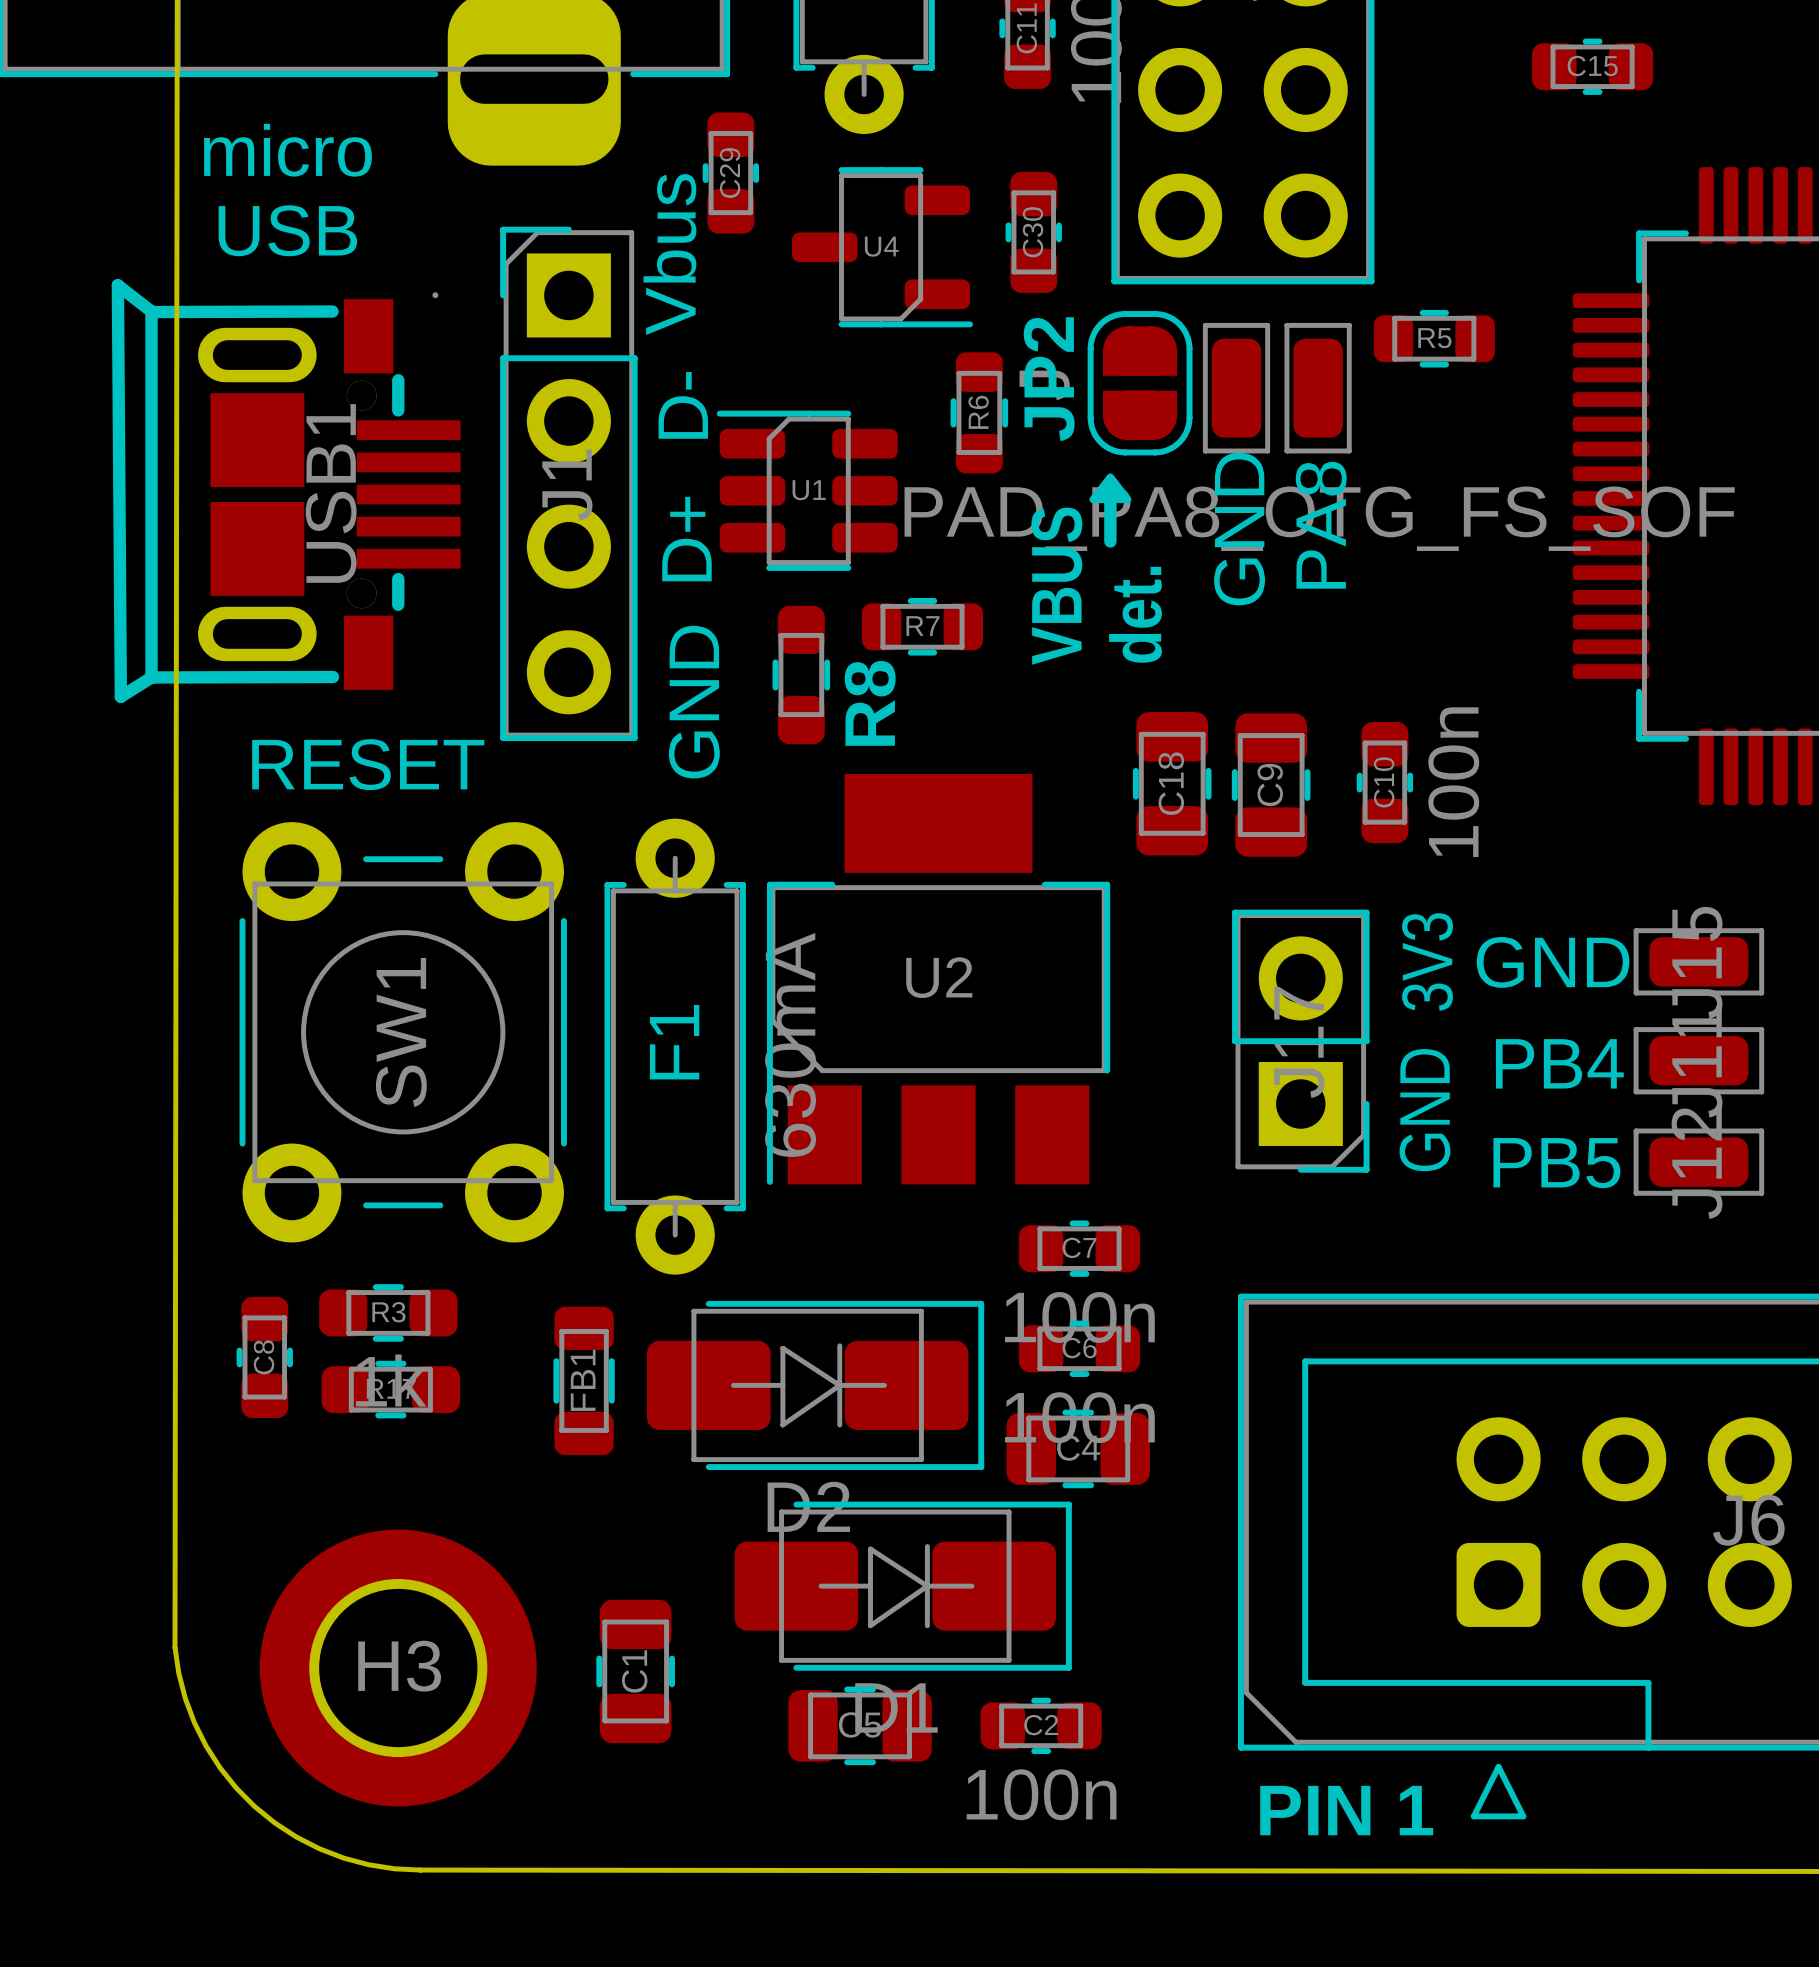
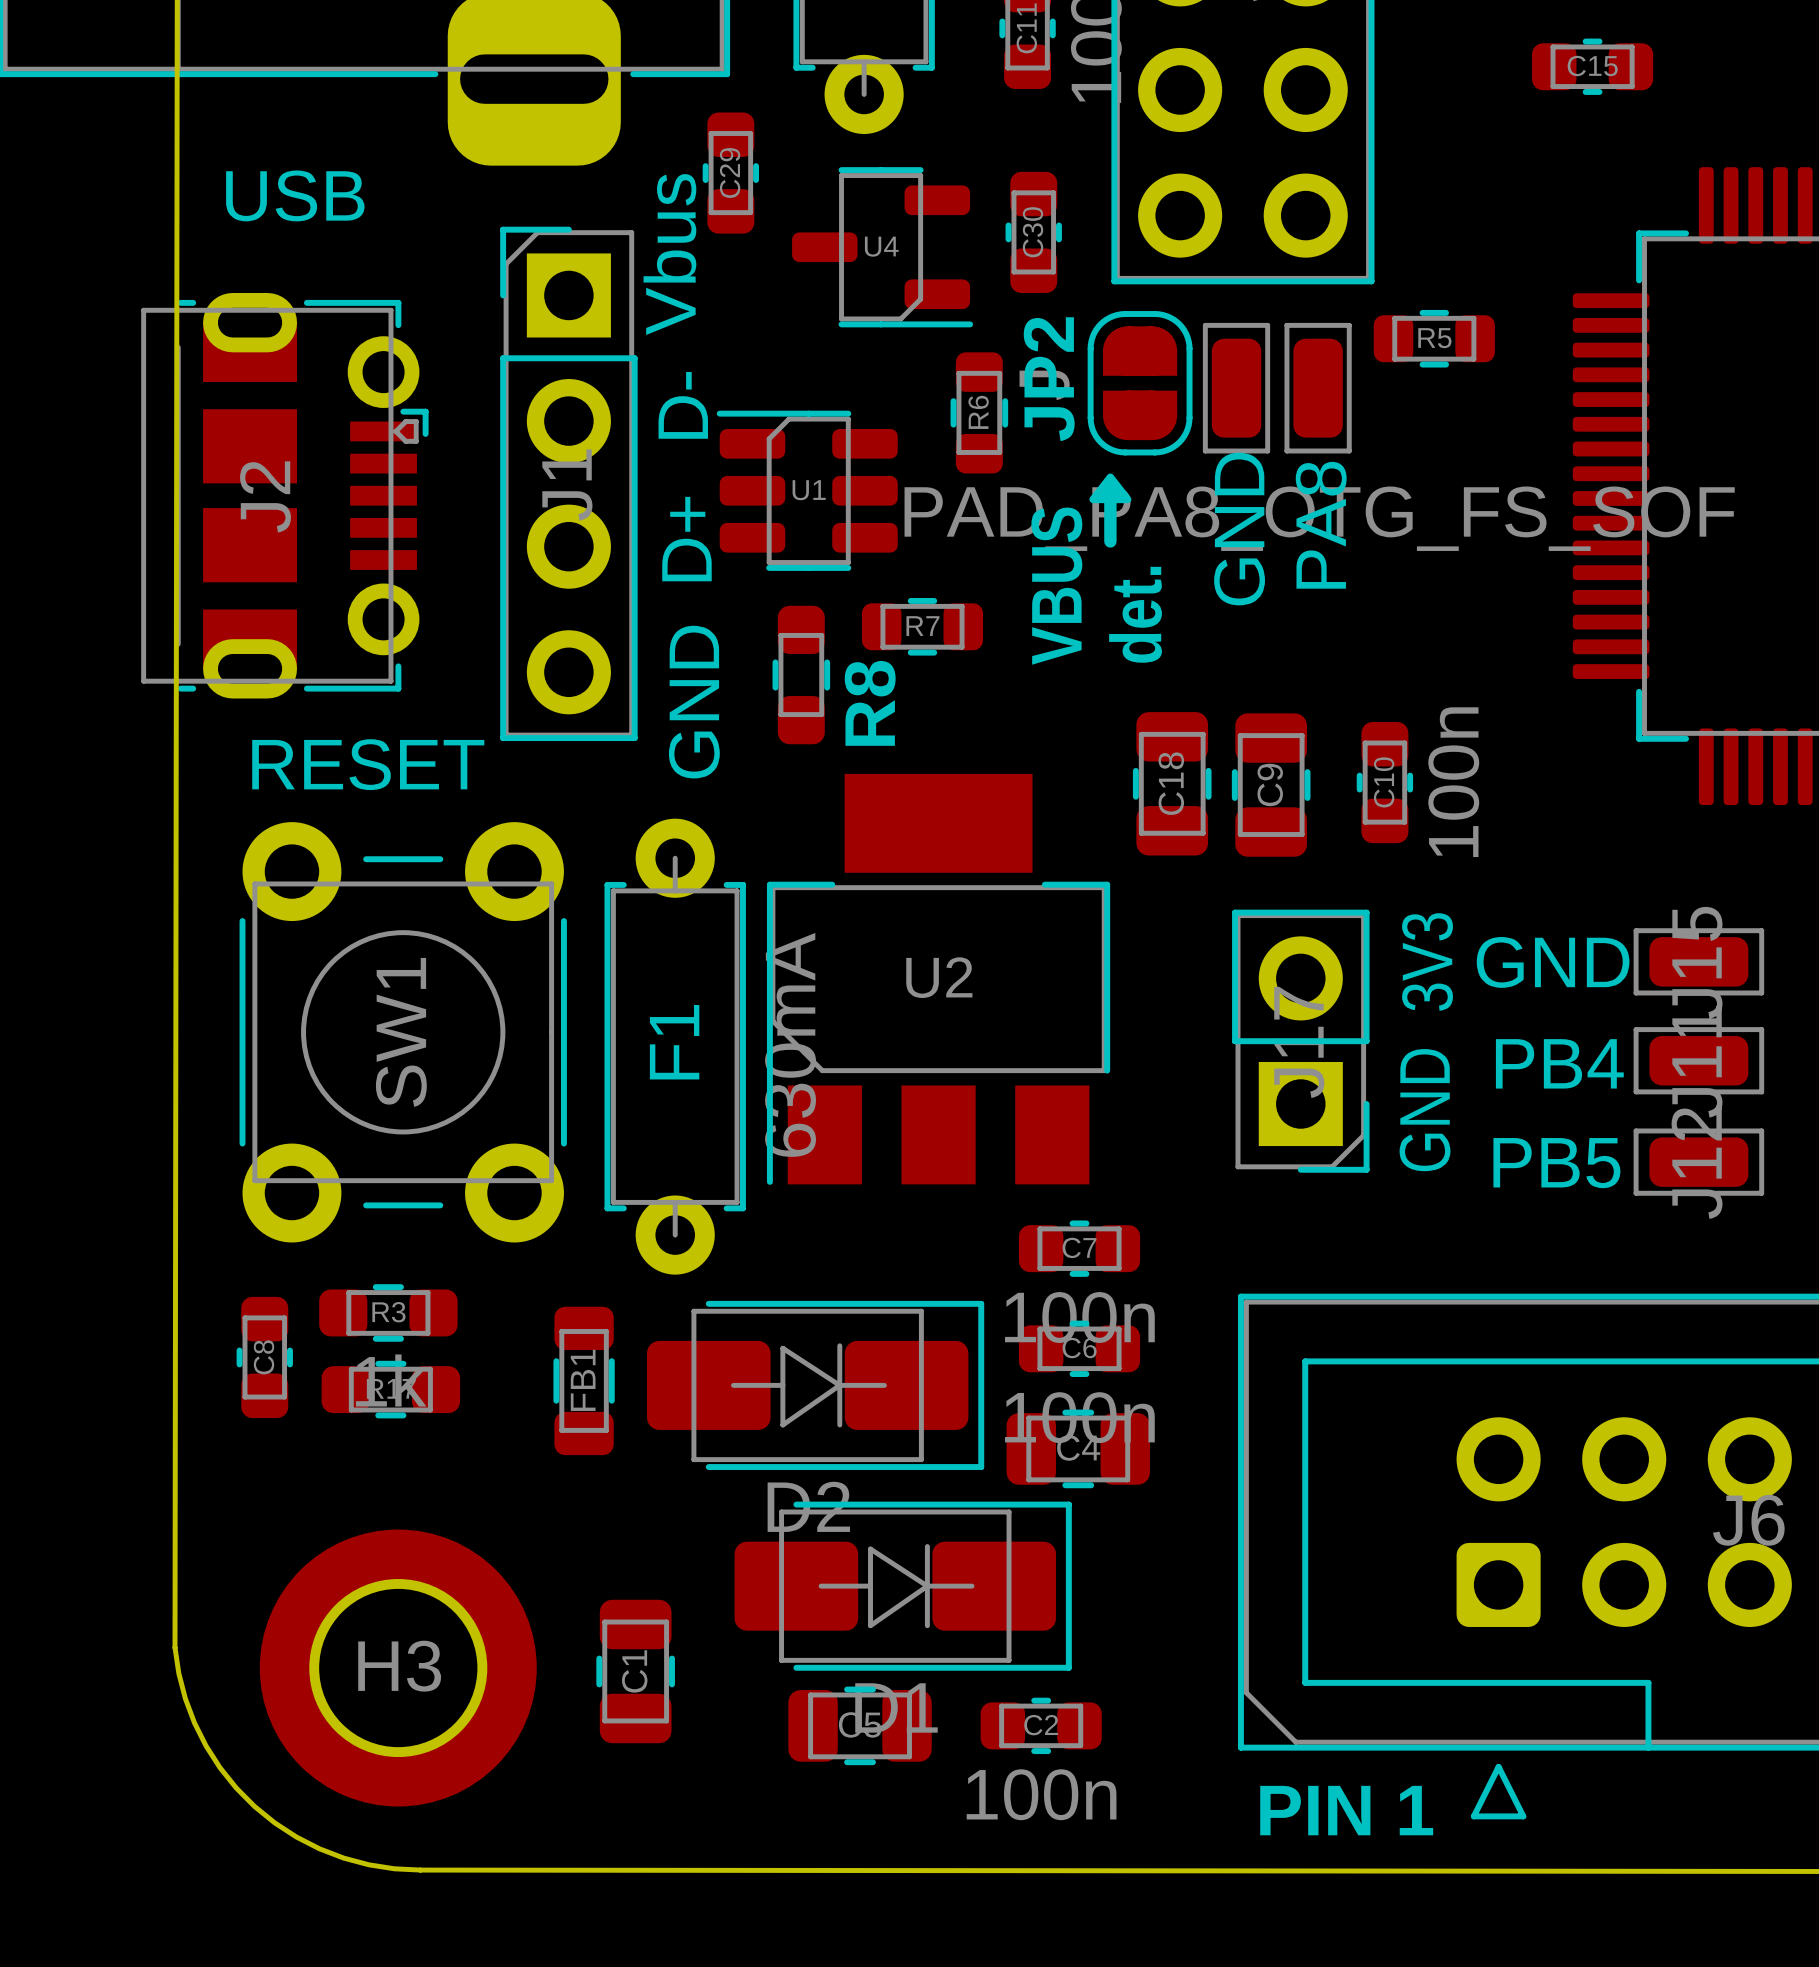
text: micro (287, 150) -> none
text position: USB (287, 230) -> USB (295, 195)
USB1: (286, 491) -> none
J2: none -> (284, 495)

